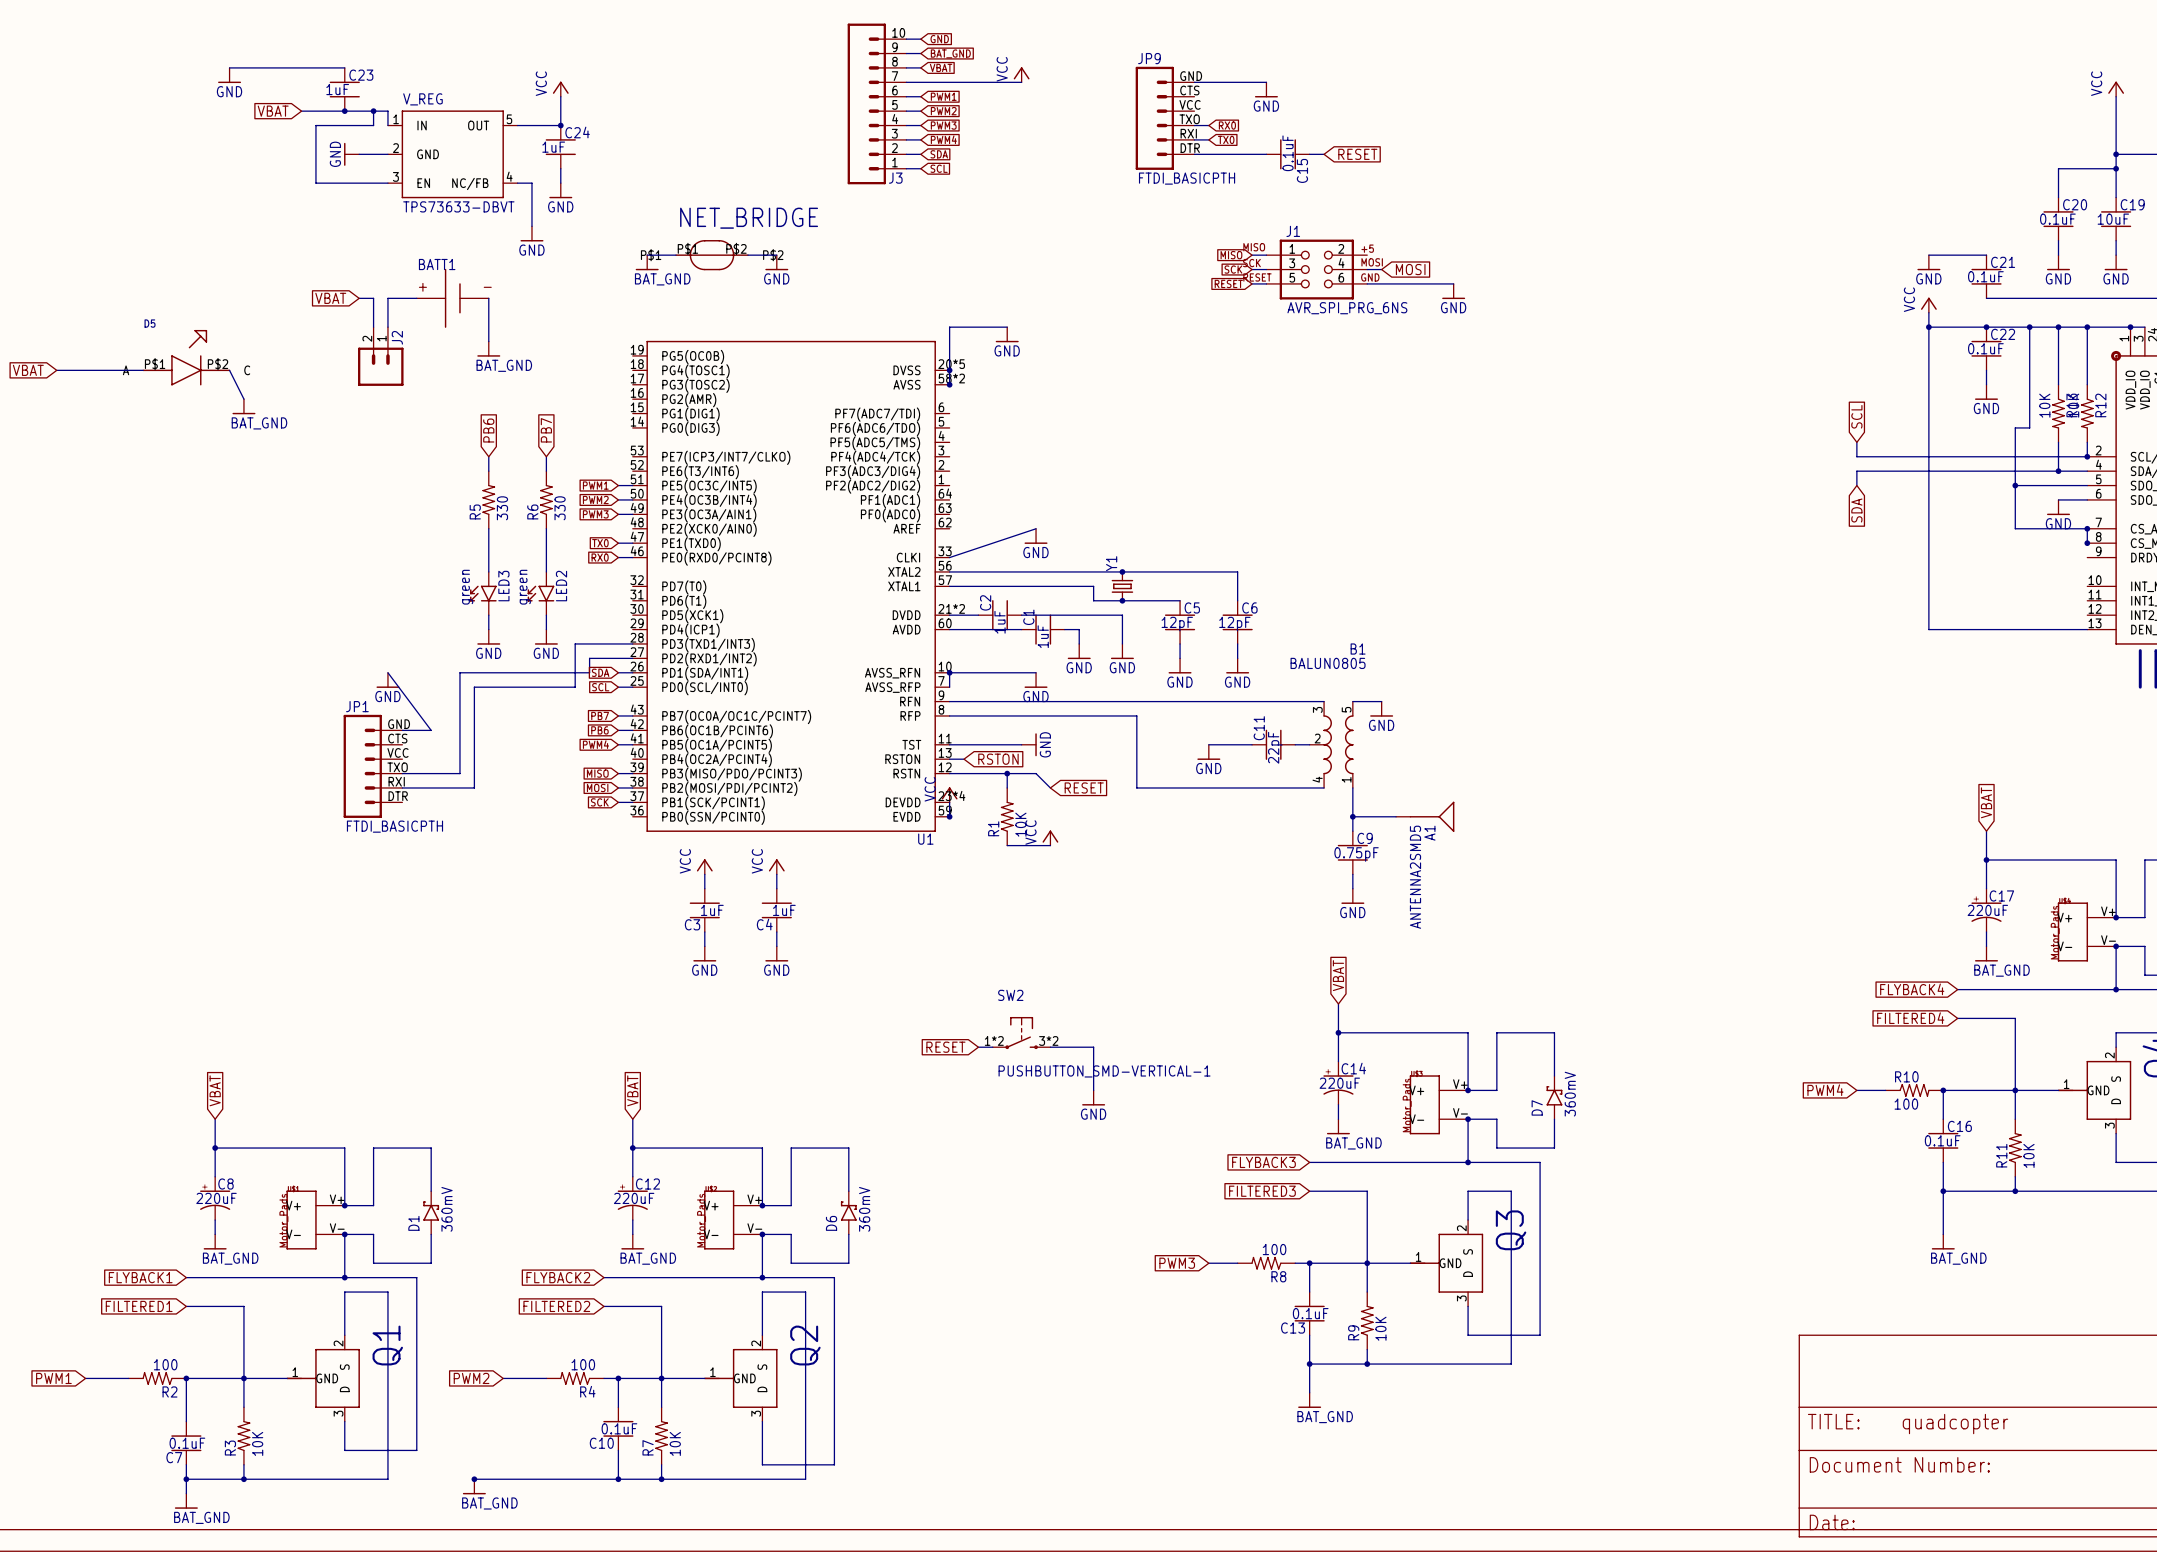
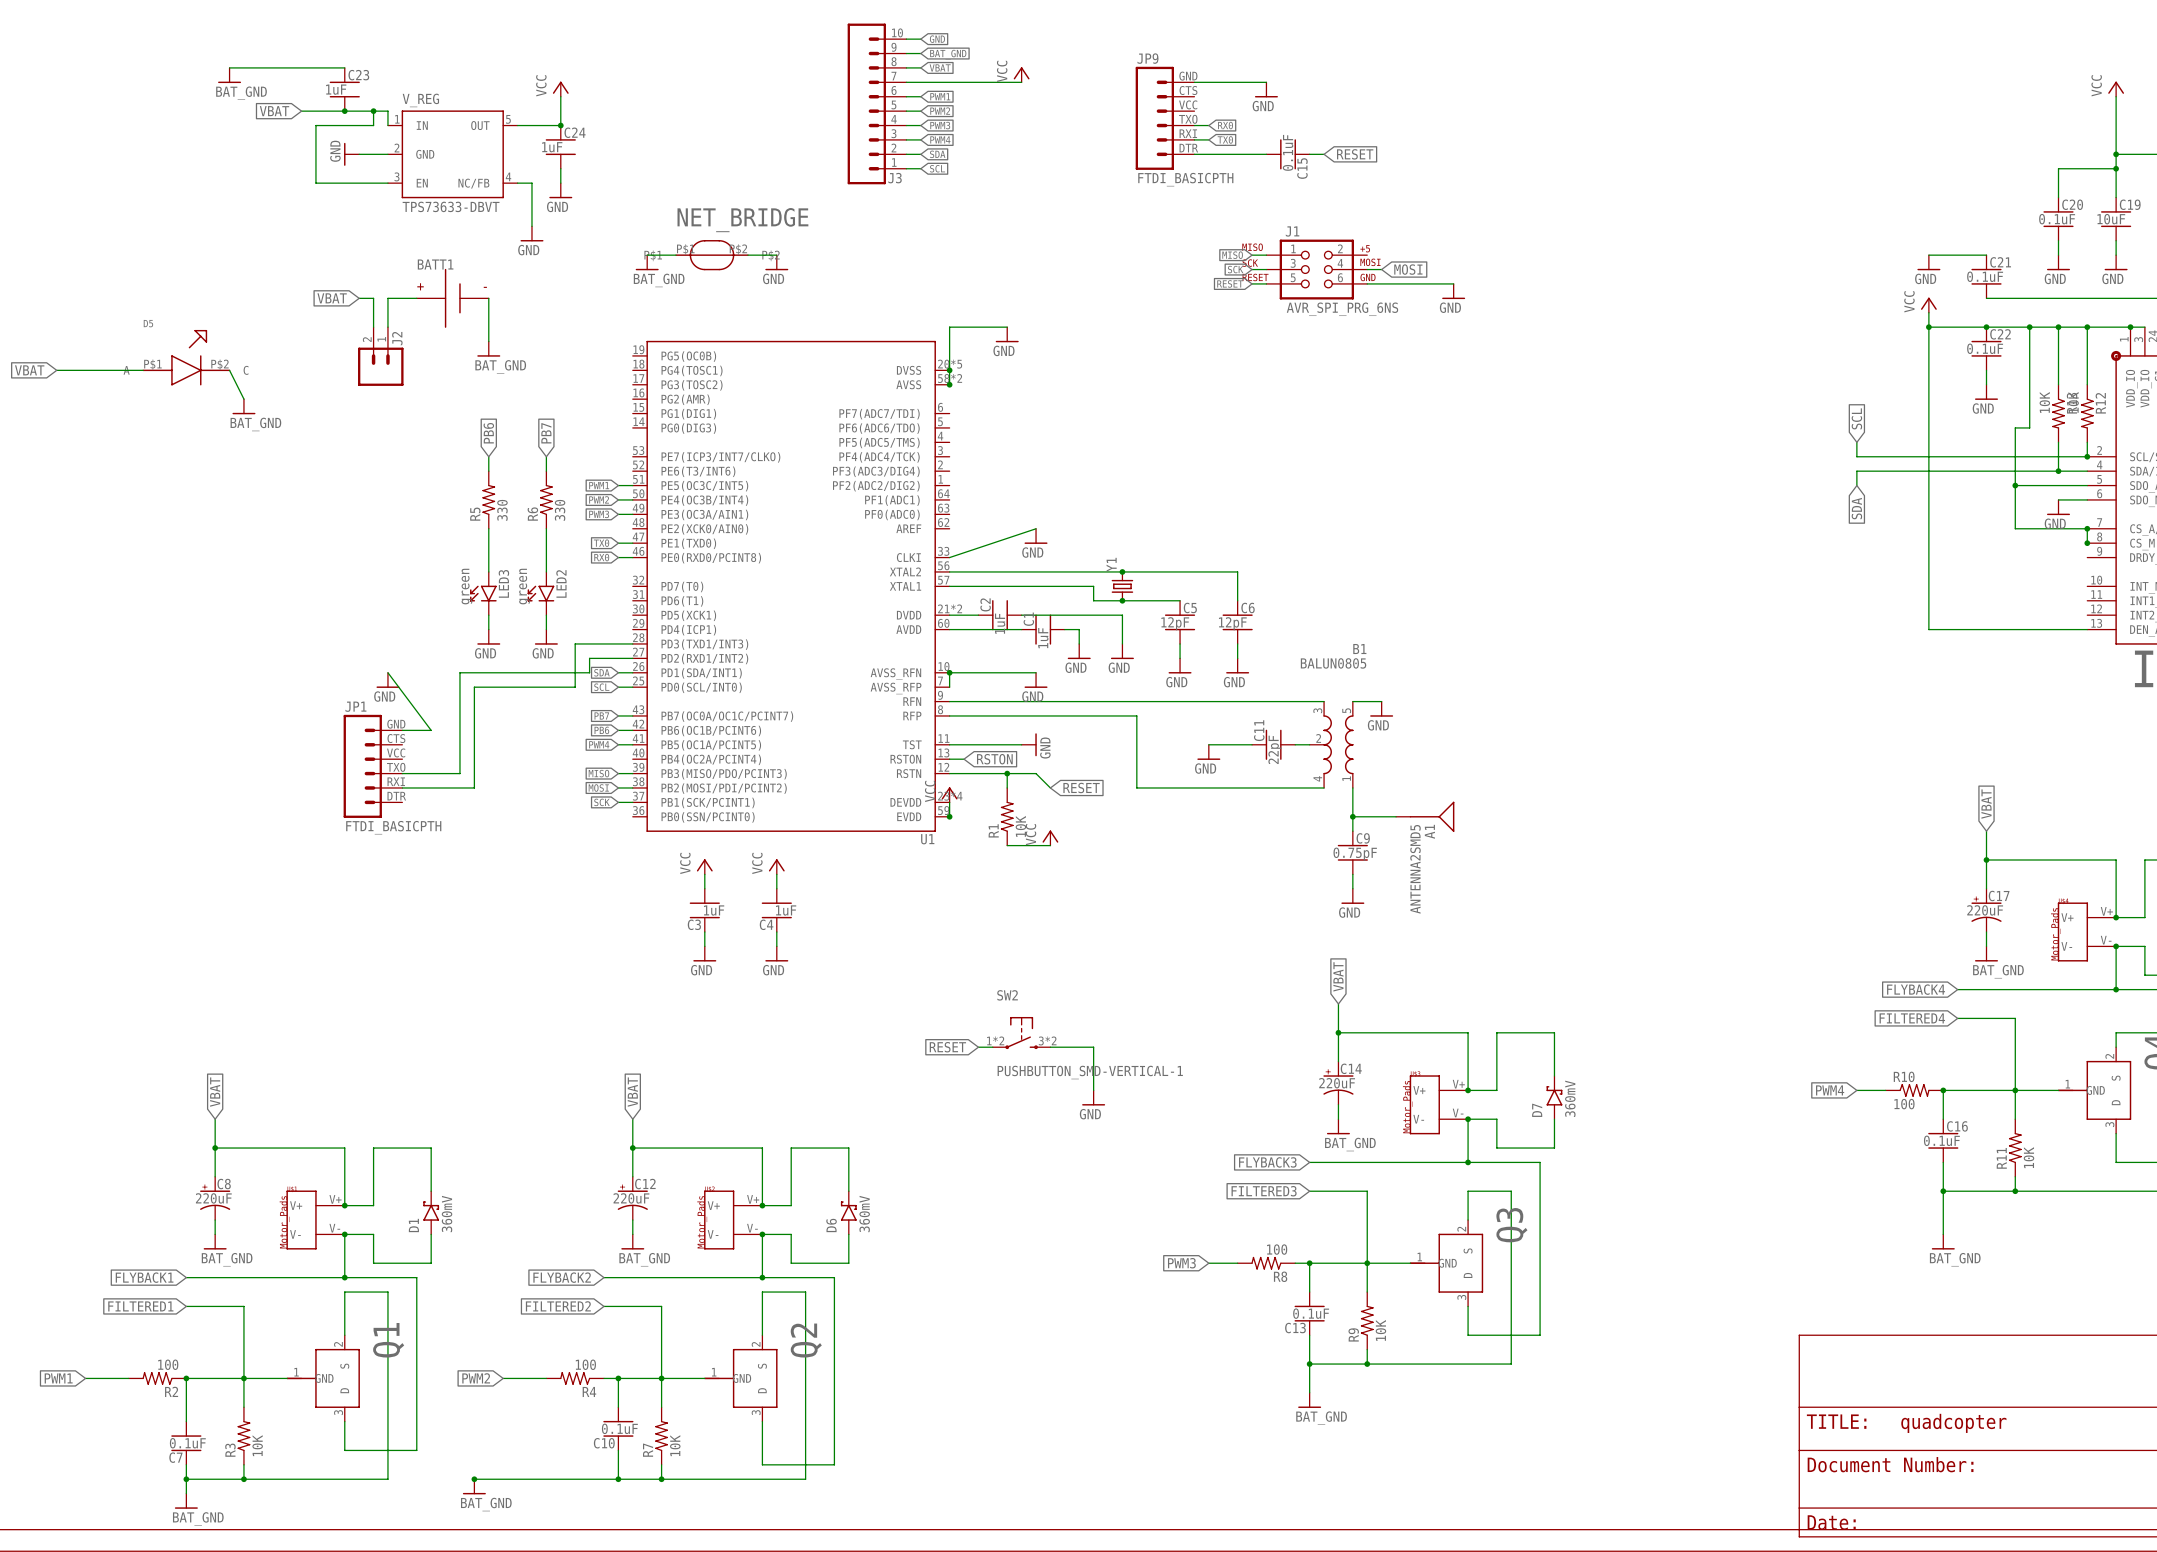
power symbol: GND (229, 75) -> BAT_GND (229, 75)

